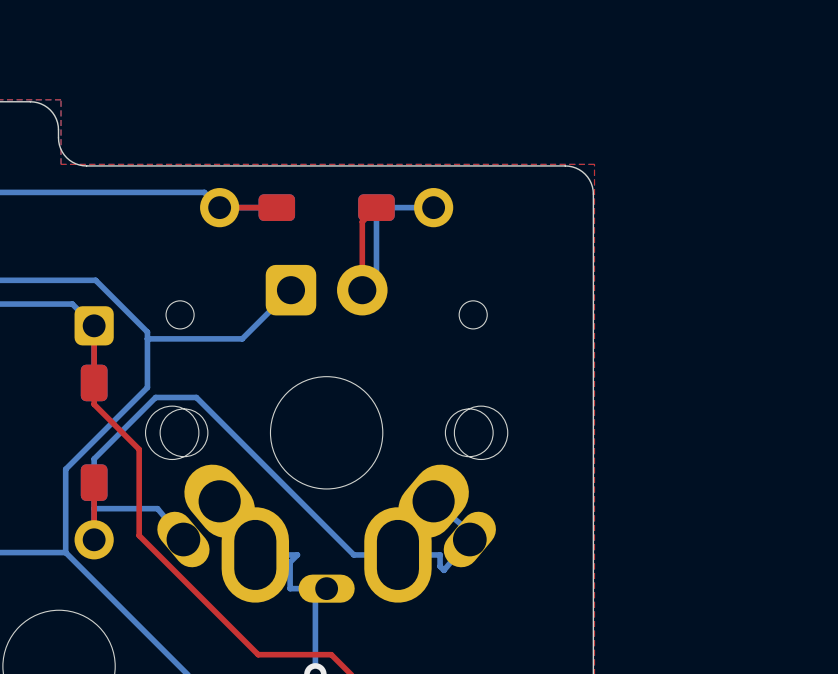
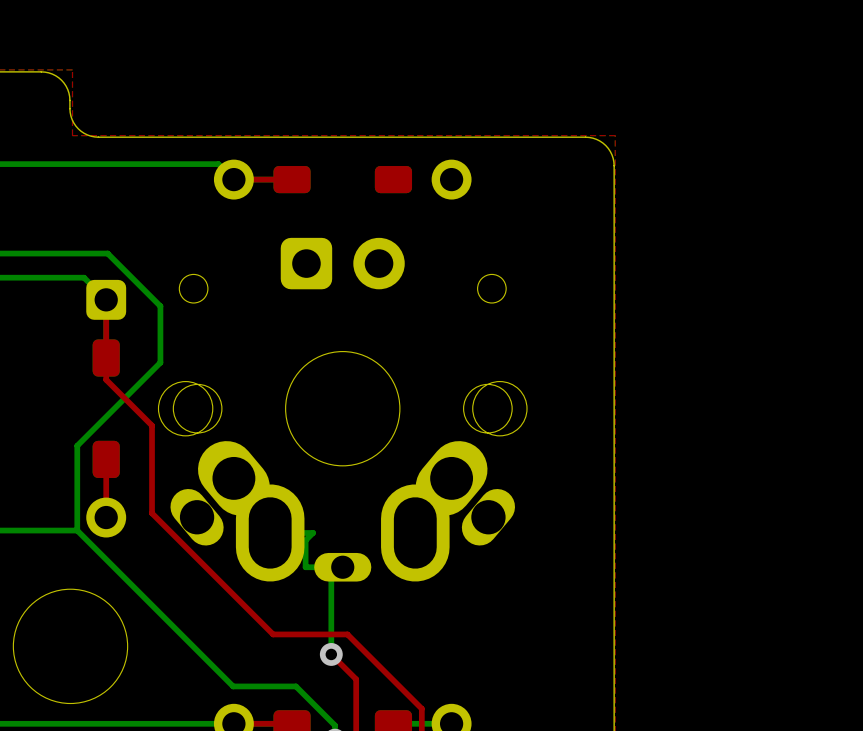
top track: (376, 207) (362, 221) (362, 290) -> none
bottom track: (433, 207) (376, 207) (376, 275) (362, 290) -> none
bottom track: (290, 290) (242, 338) (147, 338) -> none
bottom track: (433, 501) (463, 526) (463, 531) (469, 537) (443, 570) (440, 566) (440, 554) (353, 554) (196, 397) (155, 397) (94, 458) (94, 539) -> none
bottom track: (94, 508) (157, 508) (183, 539) -> none

